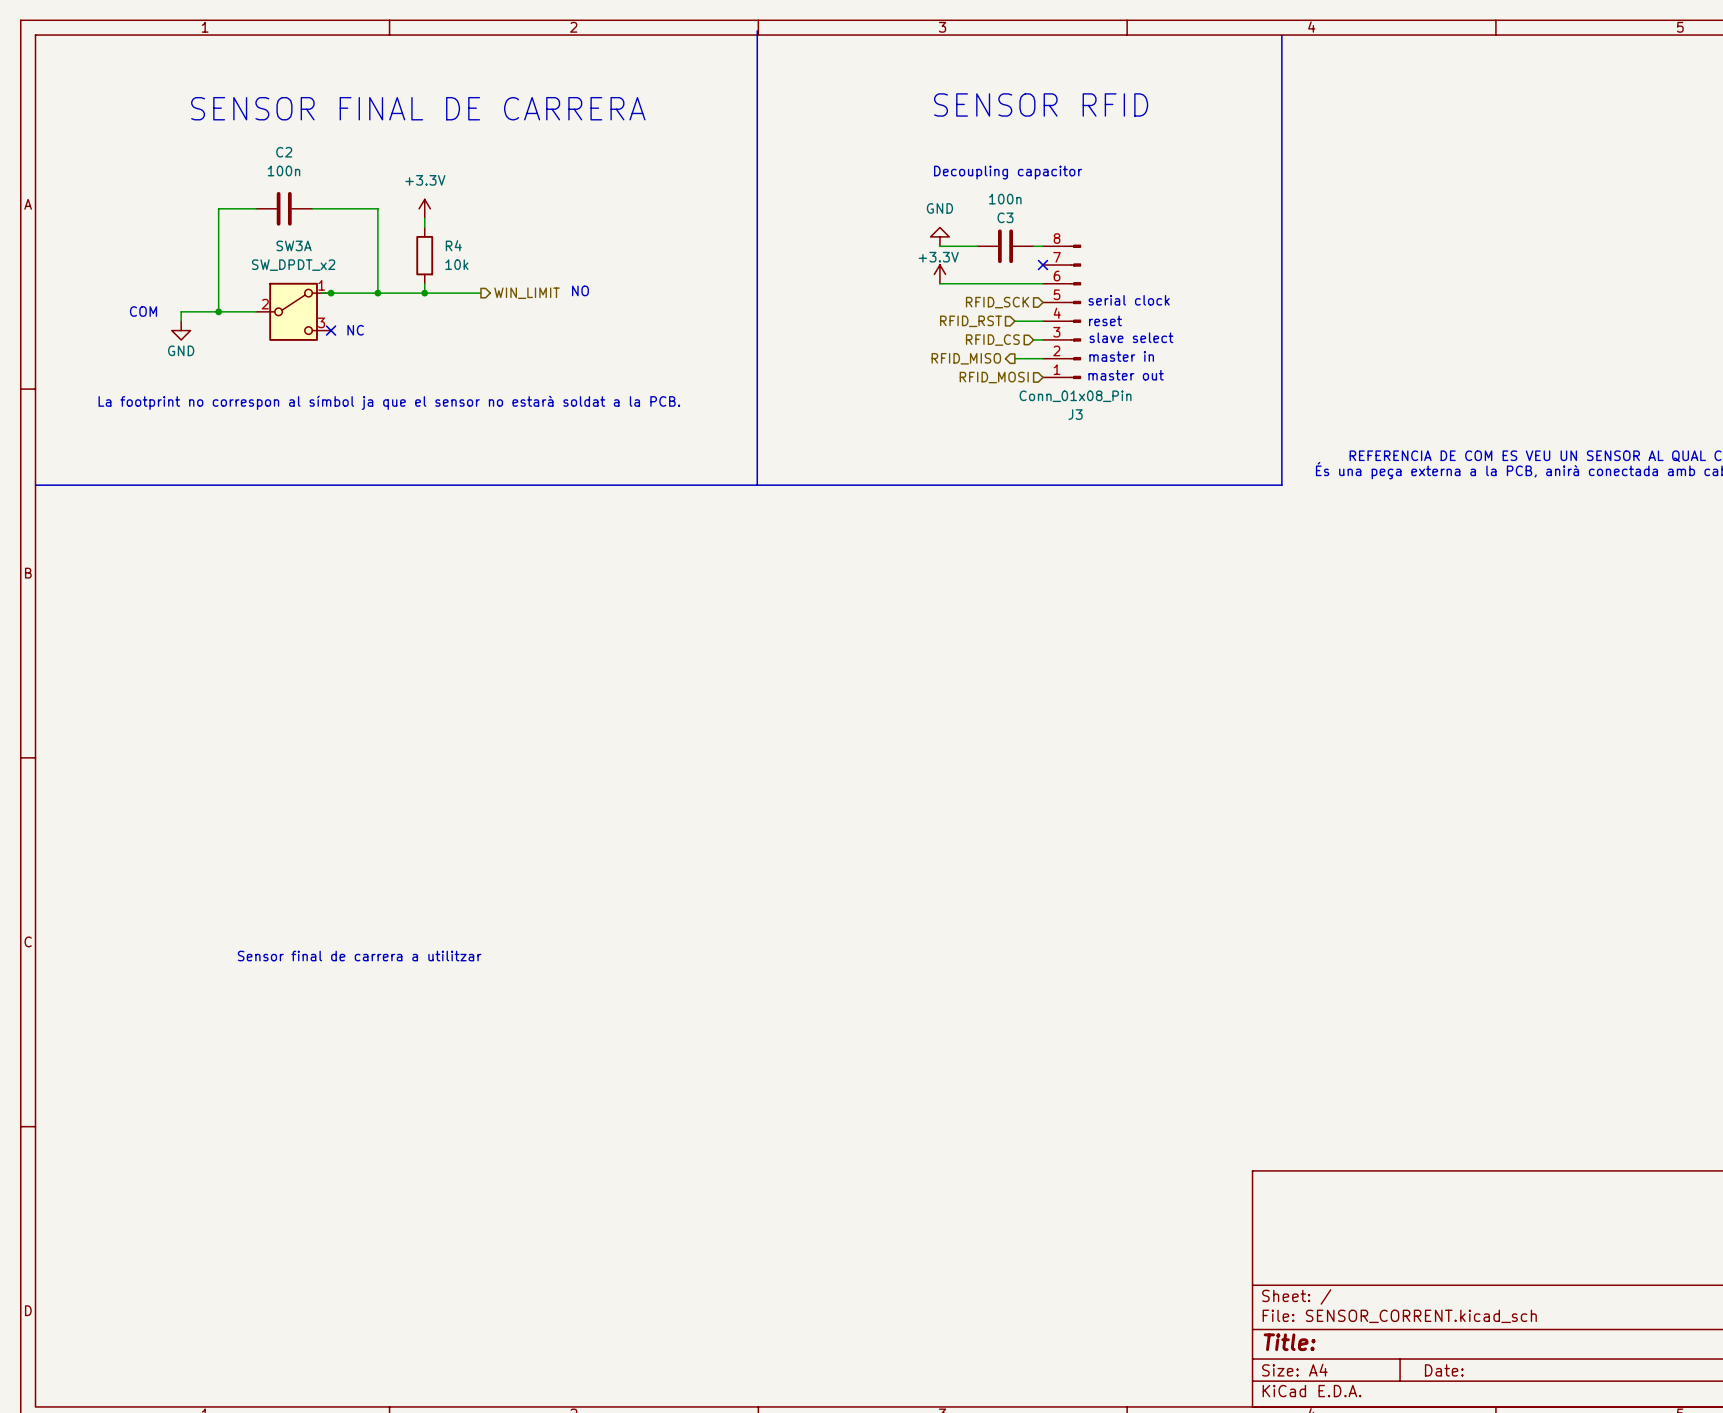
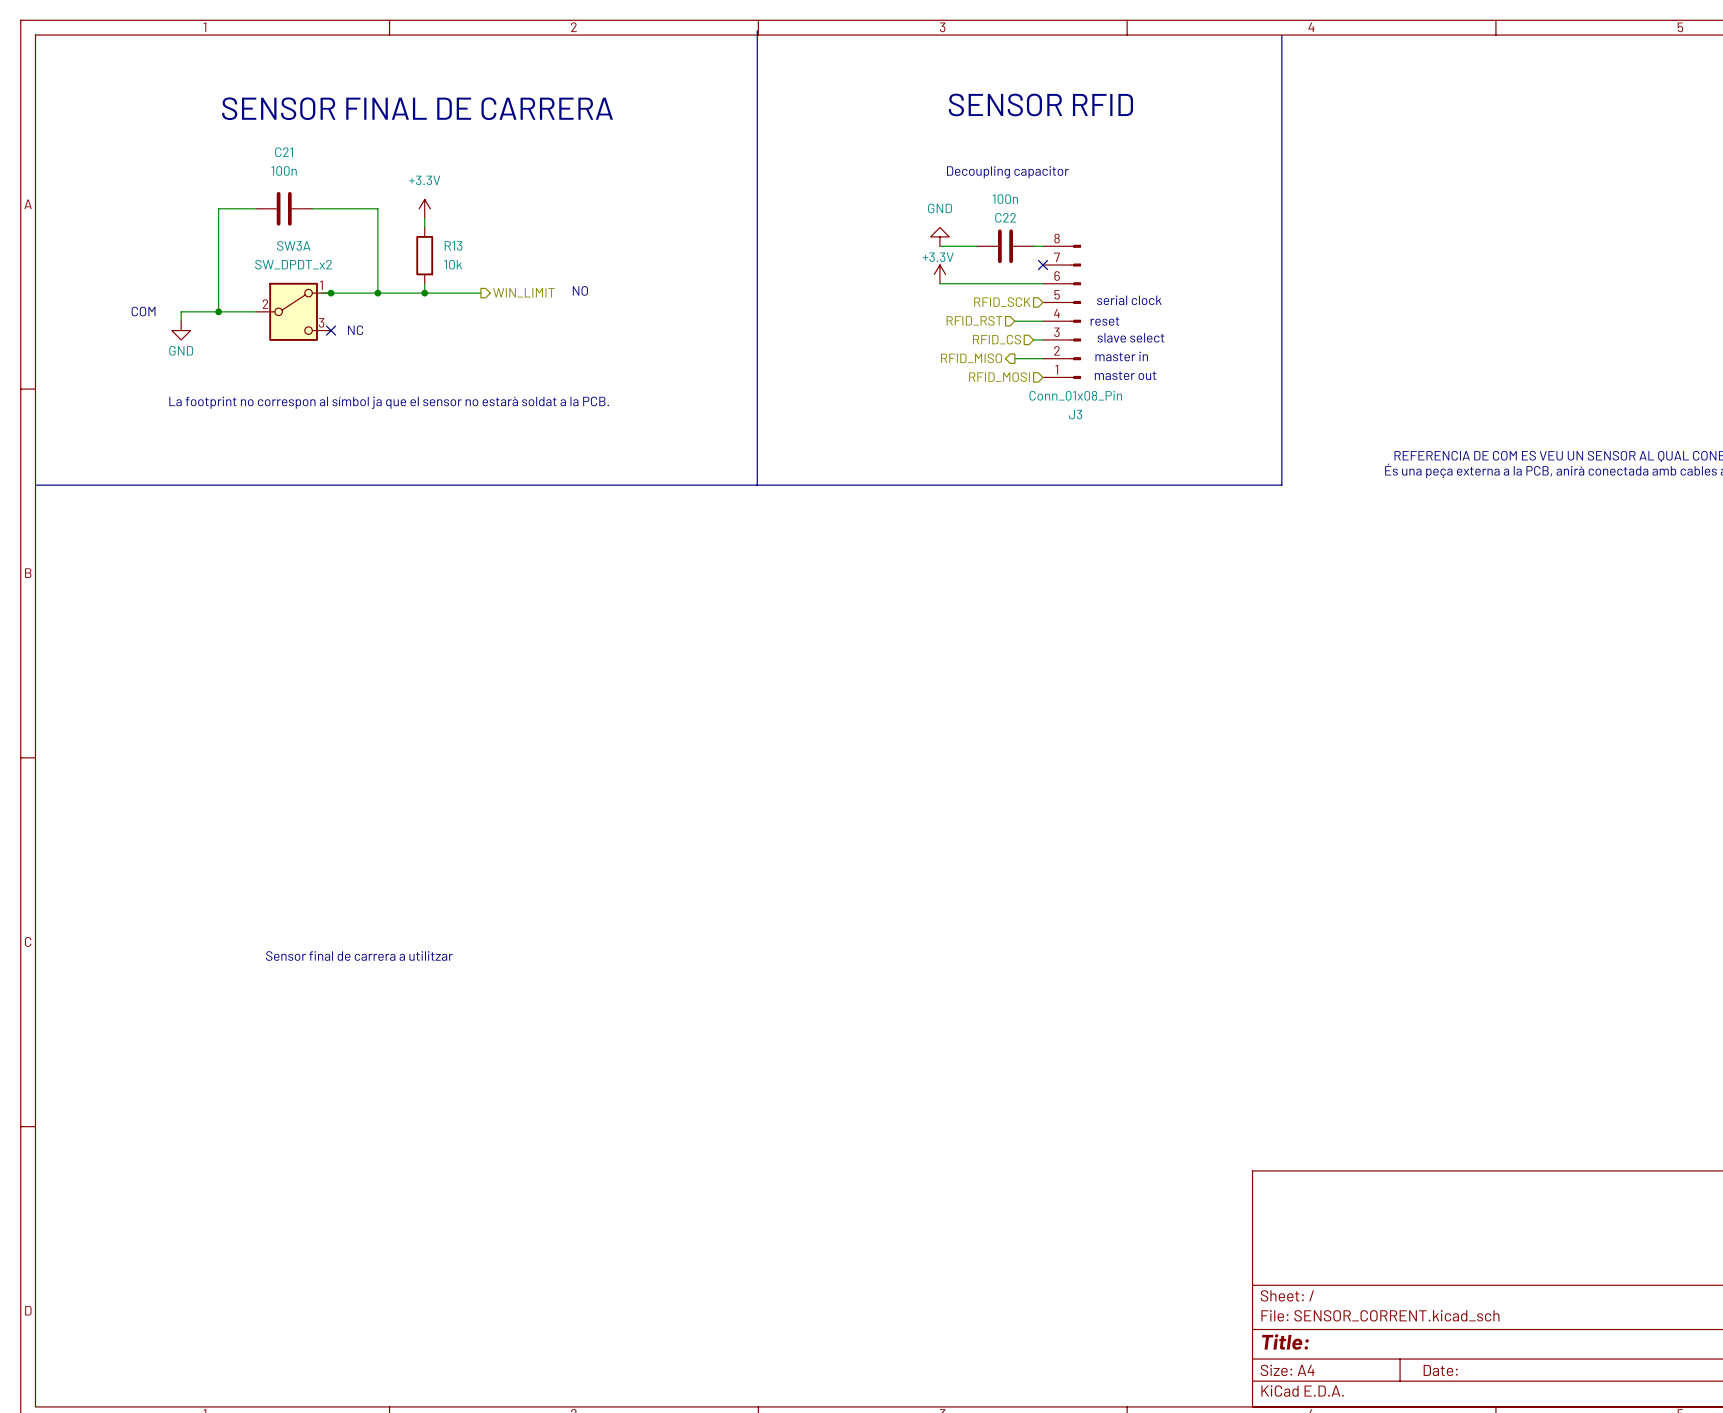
C2 name: C2 (284, 152) -> C21 (284, 152)
C3 name: C3 (1005, 217) -> C22 (1005, 217)
R4 name: R4 (453, 245) -> R13 (453, 245)

